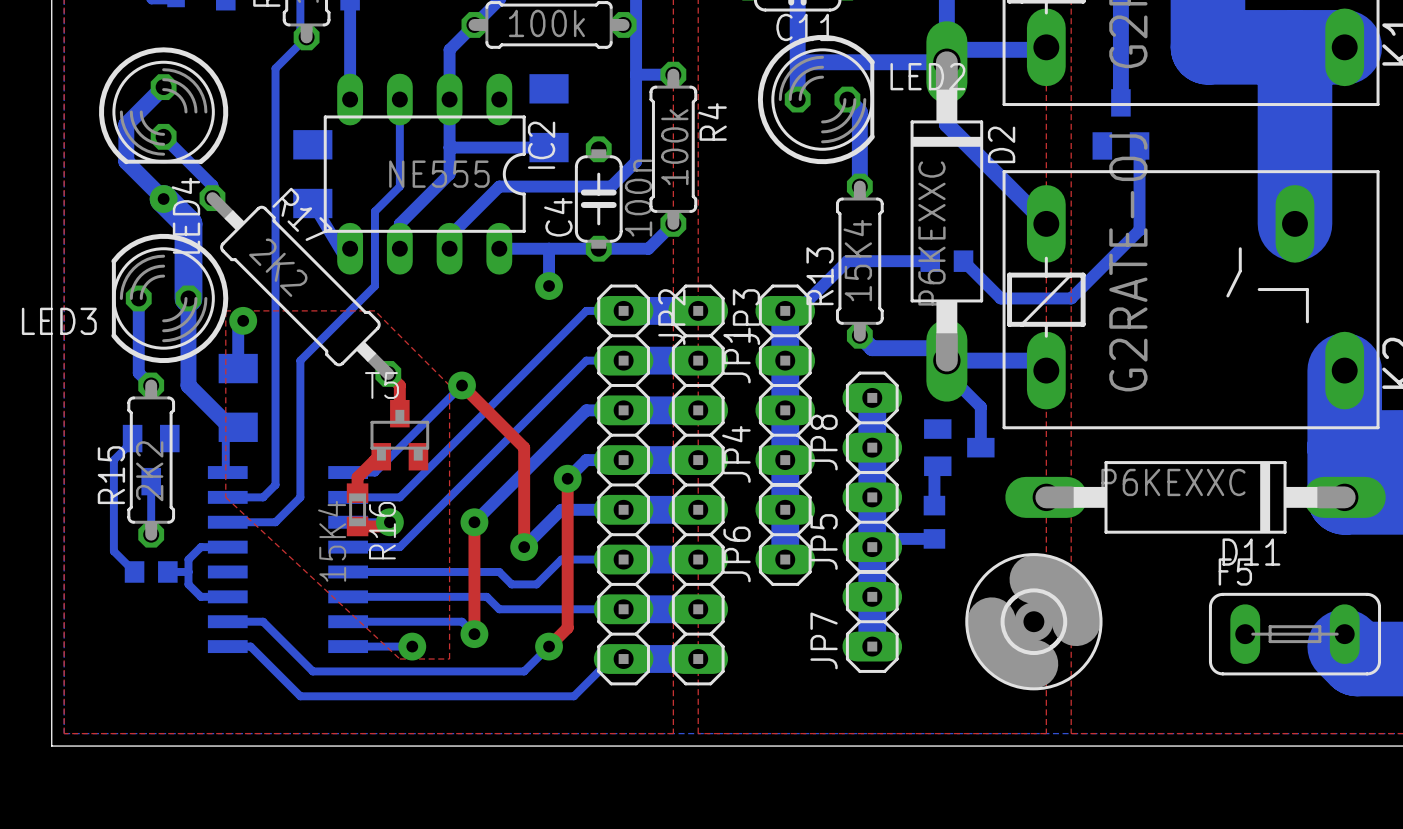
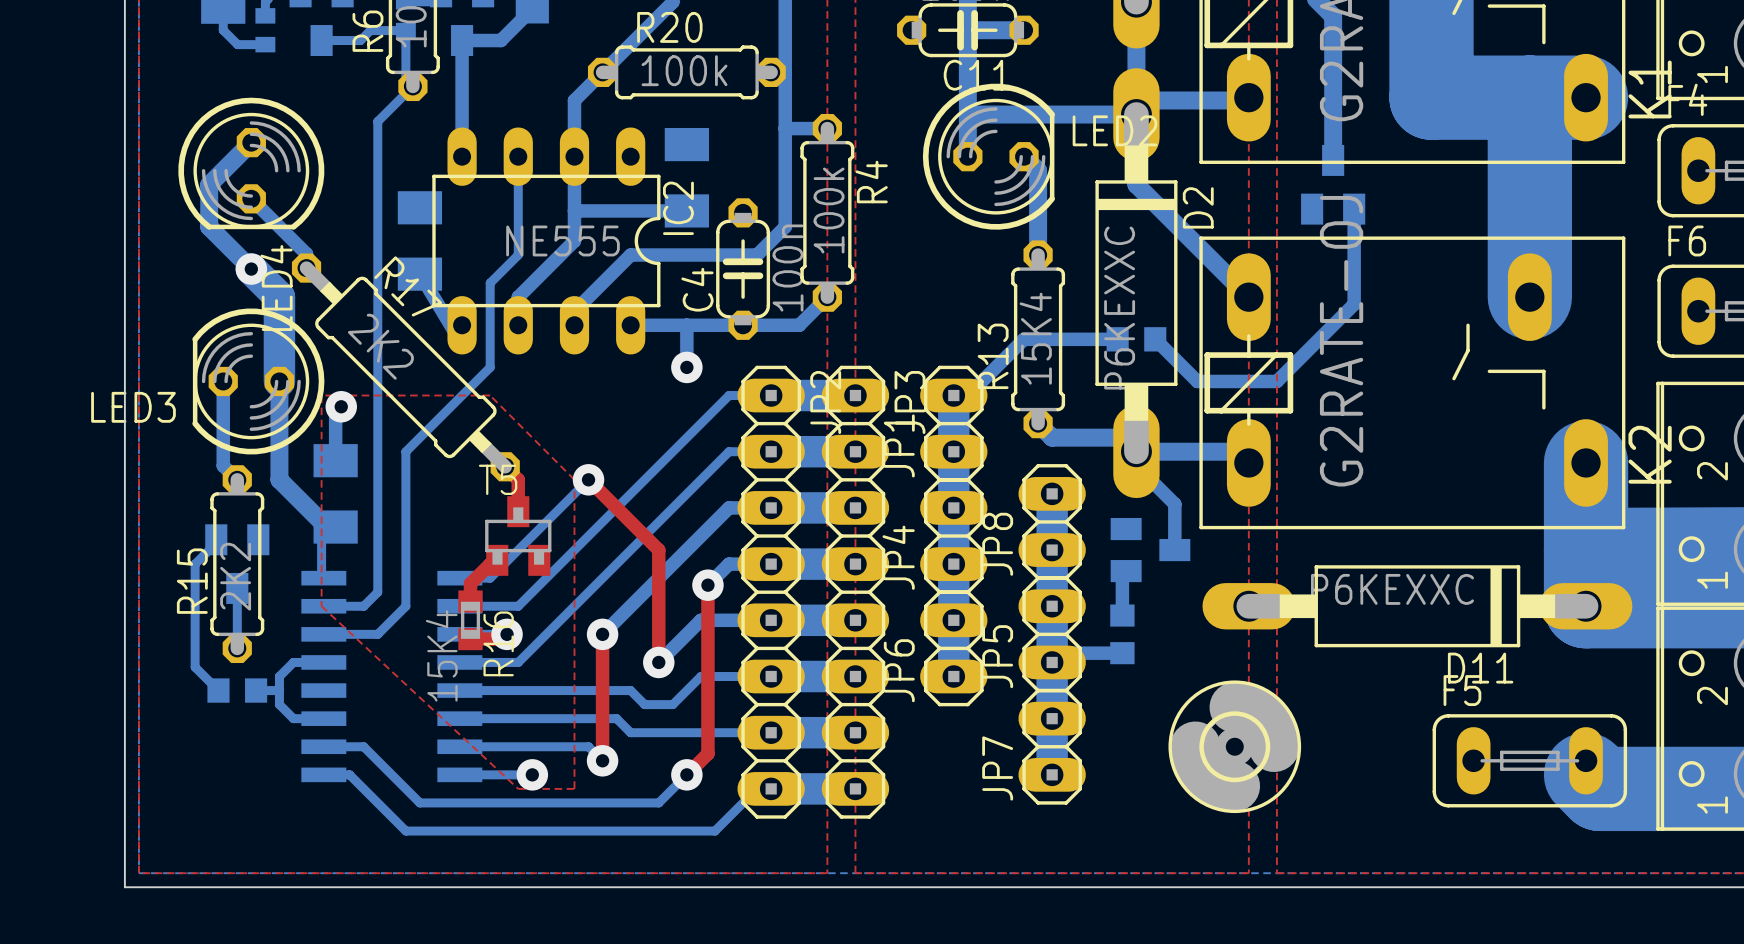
part footprint: [965, 553, 1103, 691] -> [1168, 680, 1302, 814]

